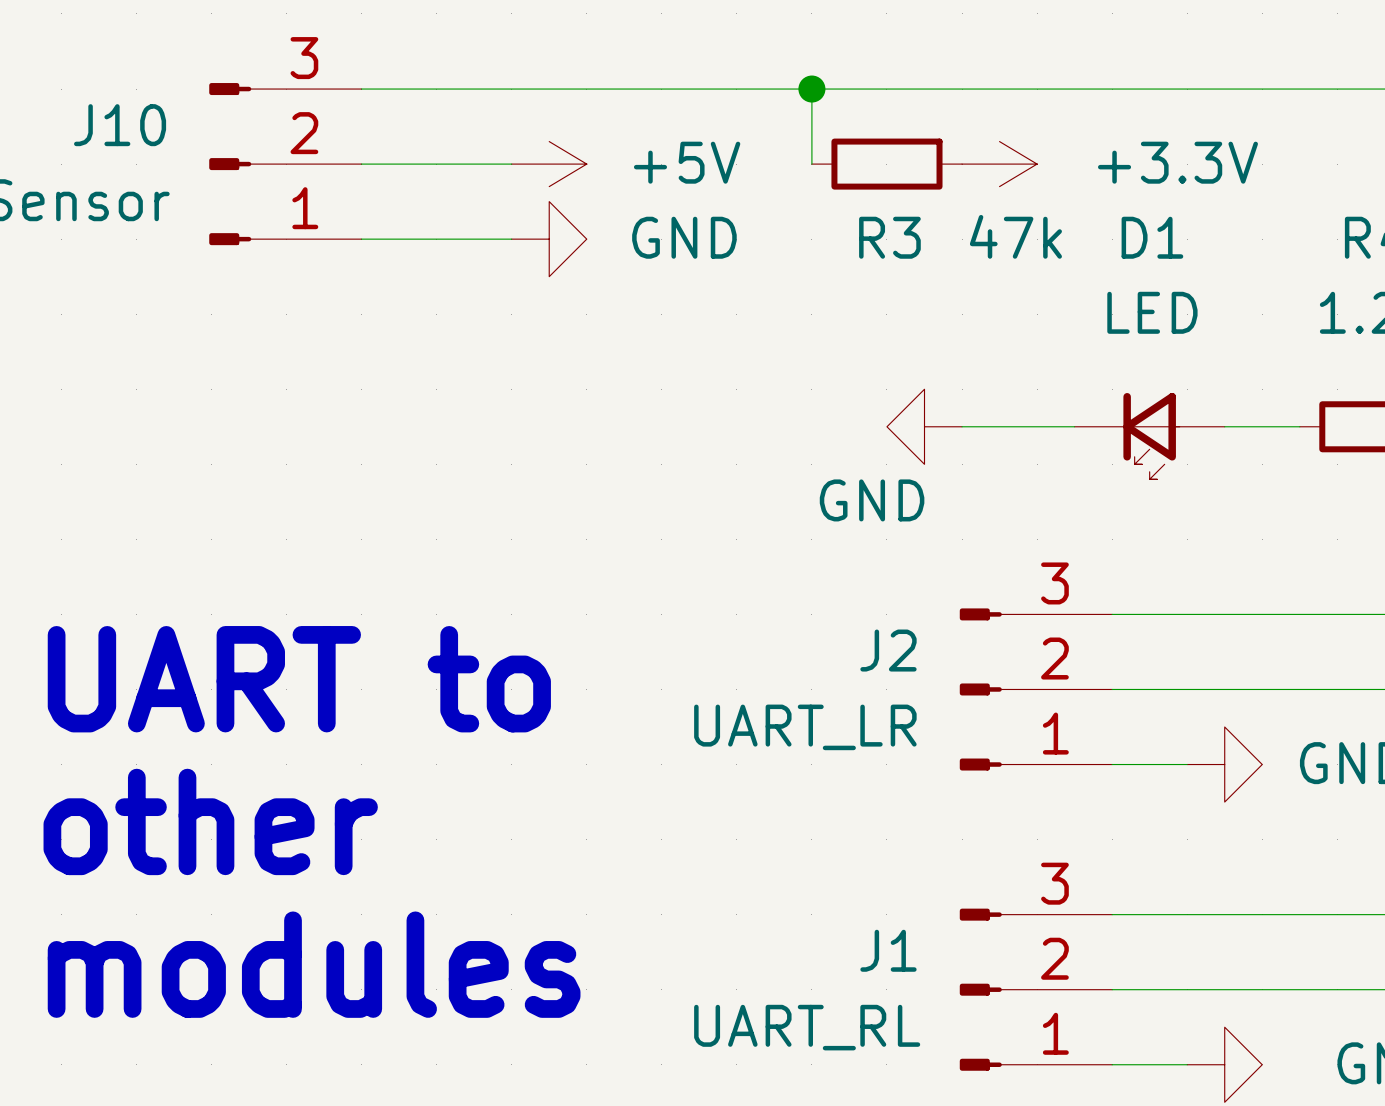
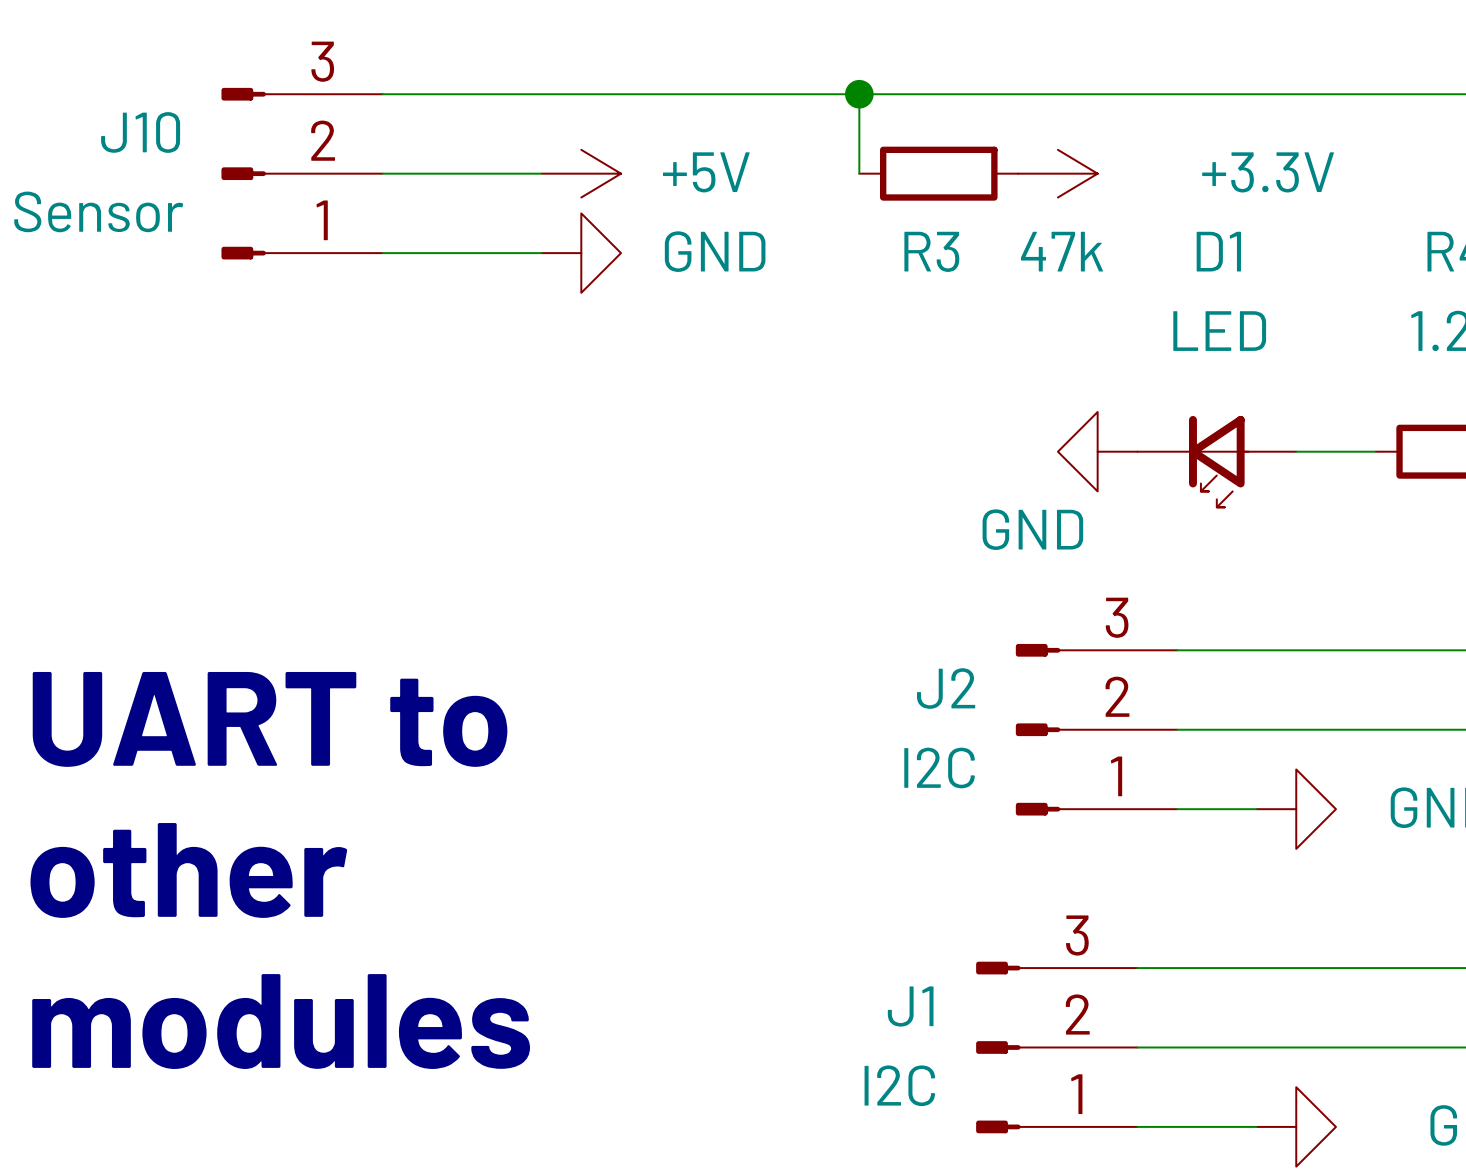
power symbol position: GND (924, 426) -> GND (1097, 451)
wire: (962, 426) (1074, 426) -> none
J2 value: UART_LR (805, 727) -> I2C (939, 768)
J1 position: (1035, 989) -> (1056, 1047)
J1 value: UART_RL (807, 1027) -> I2C (899, 1085)

